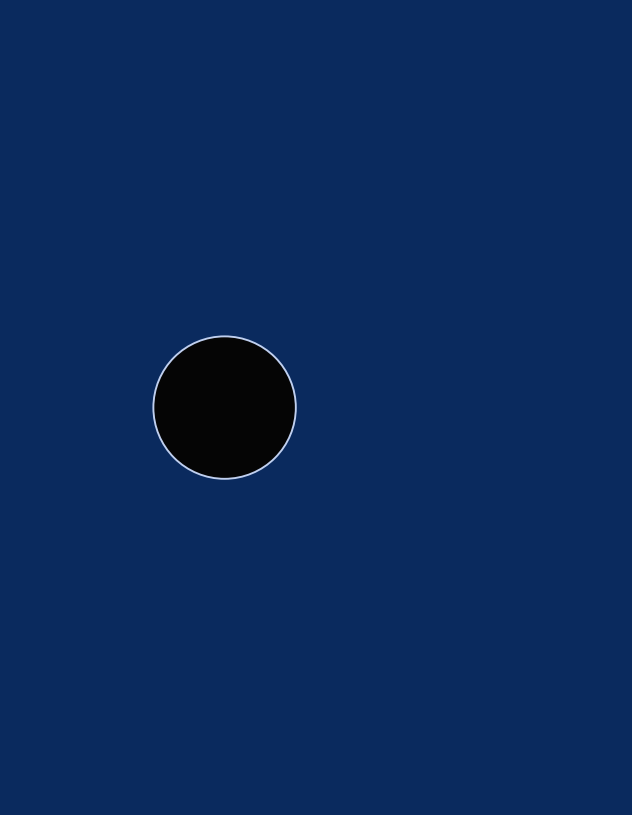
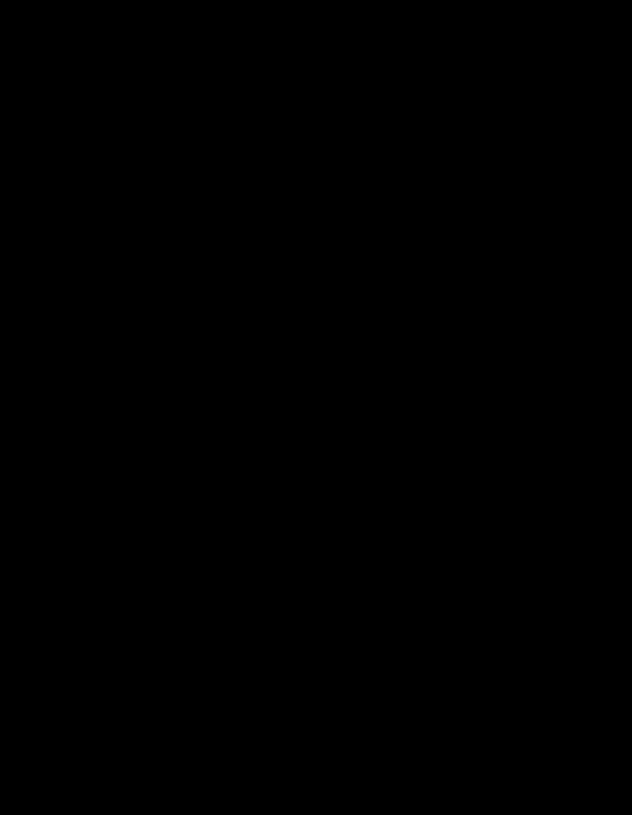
part: (224, 407) -> none

